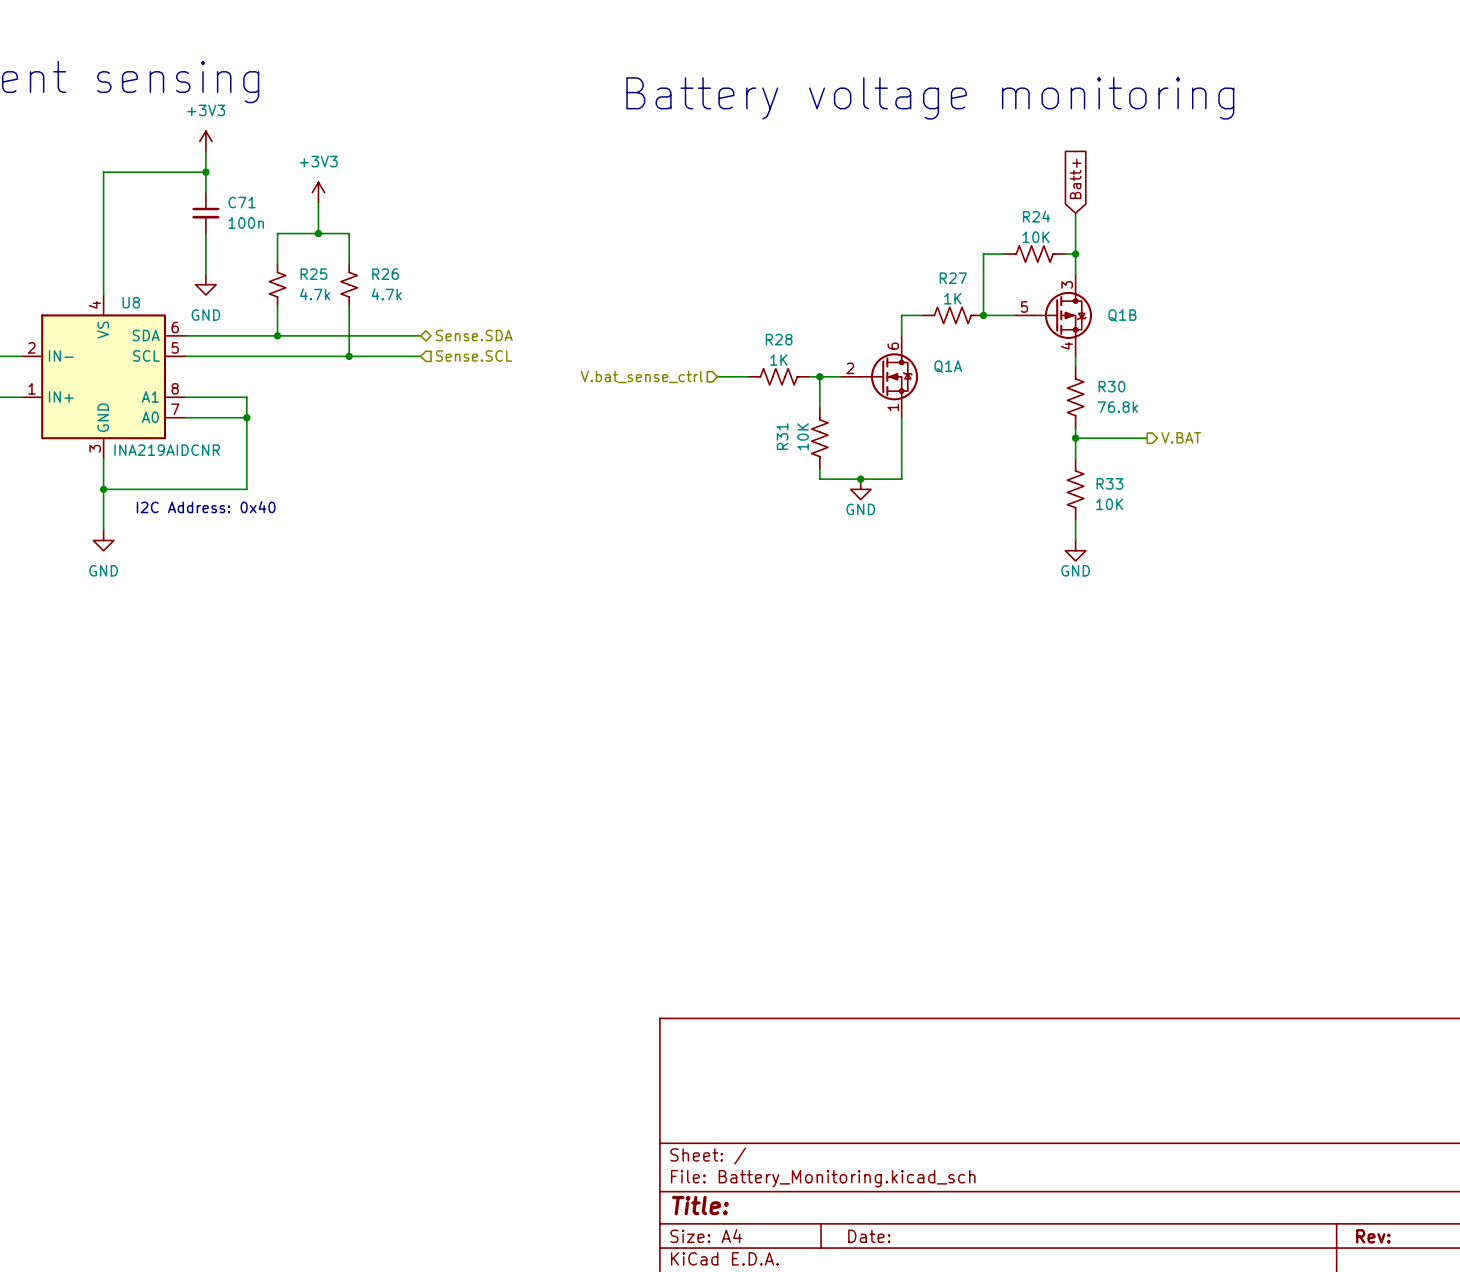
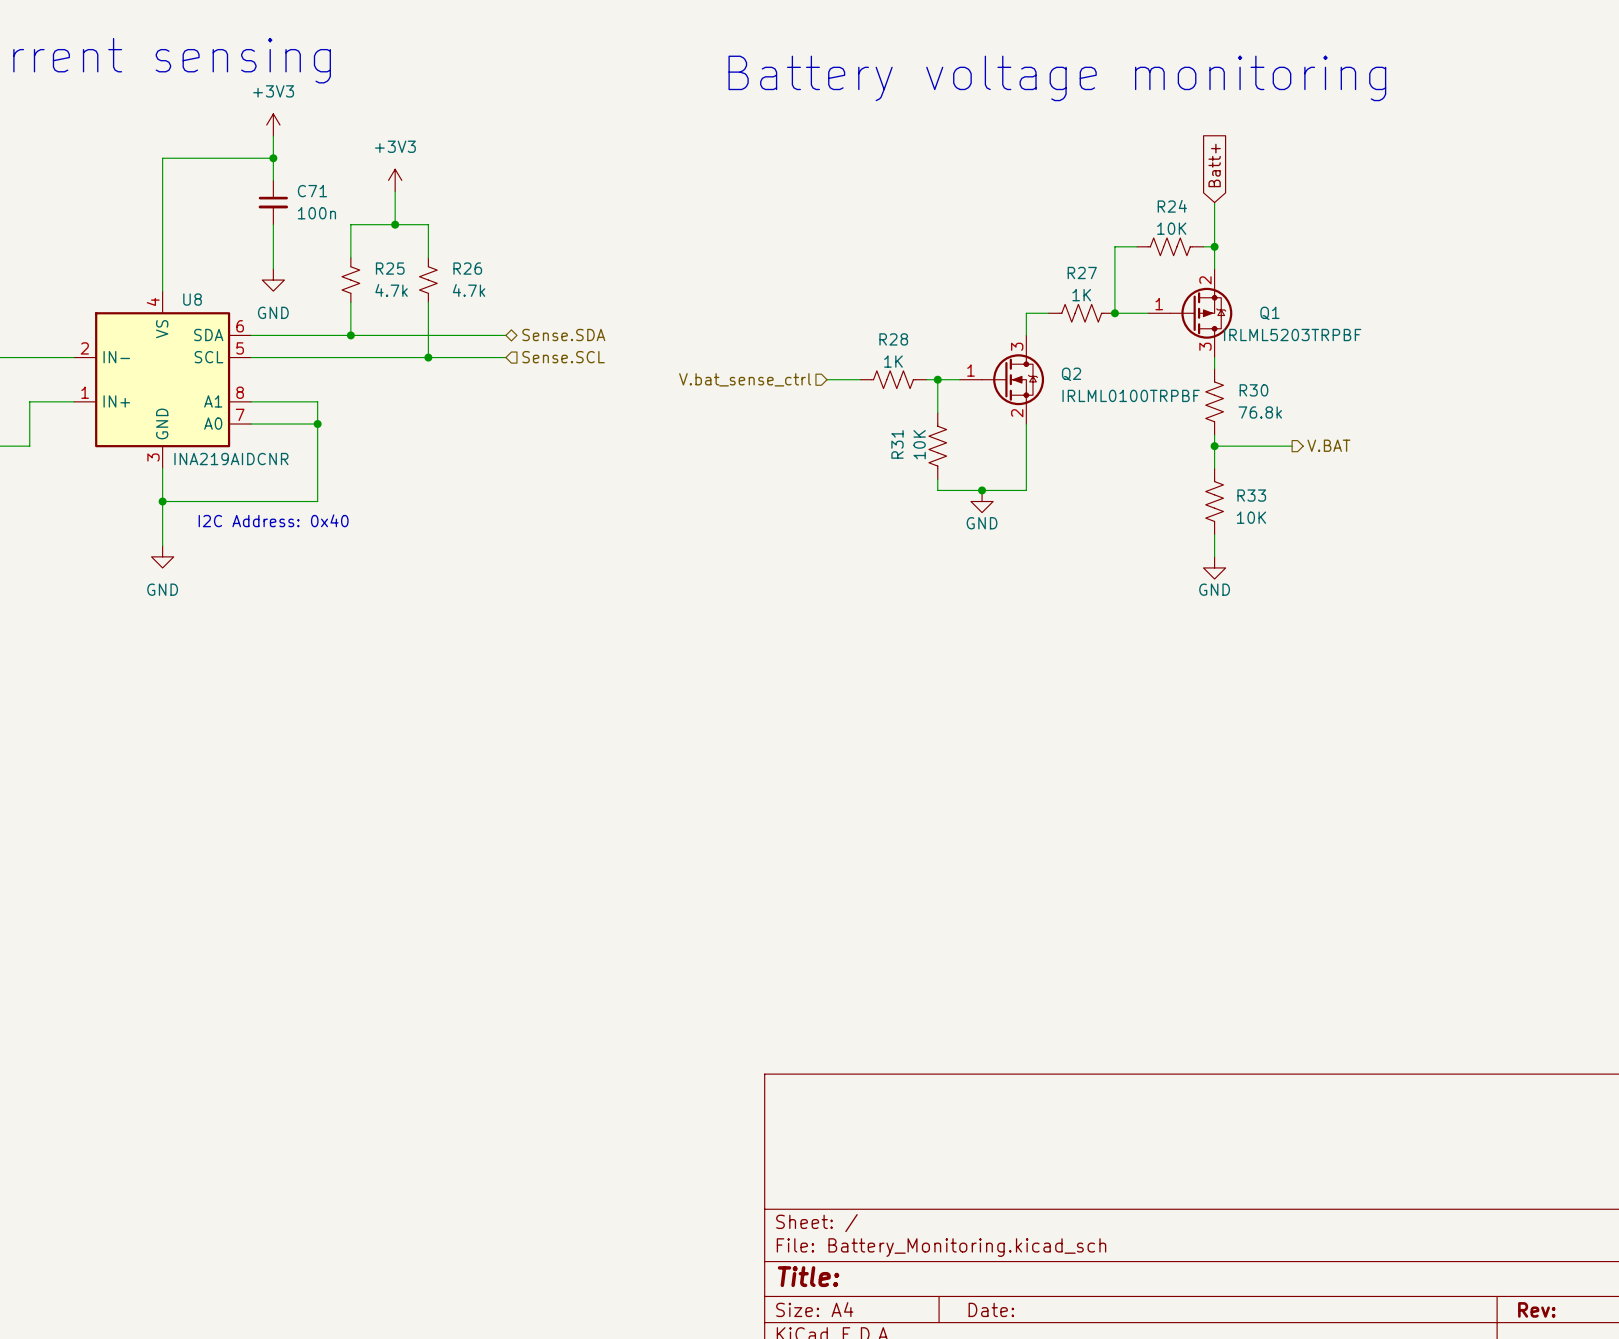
Q1B: (1053, 315) -> none
Q1: none -> IRLML5203TRPBF (1190, 313)
Q1A pin number: 6 (893, 346) -> 3 (1017, 346)
Q1A name: Q1A (948, 366) -> Q2 (1071, 374)
Q1A pin number: 2 (850, 368) -> 1 (970, 370)
Q1A value: none -> IRLML0100TRPBF (1131, 395)
Q1A pin number: 1 (893, 407) -> 2 (1017, 413)

